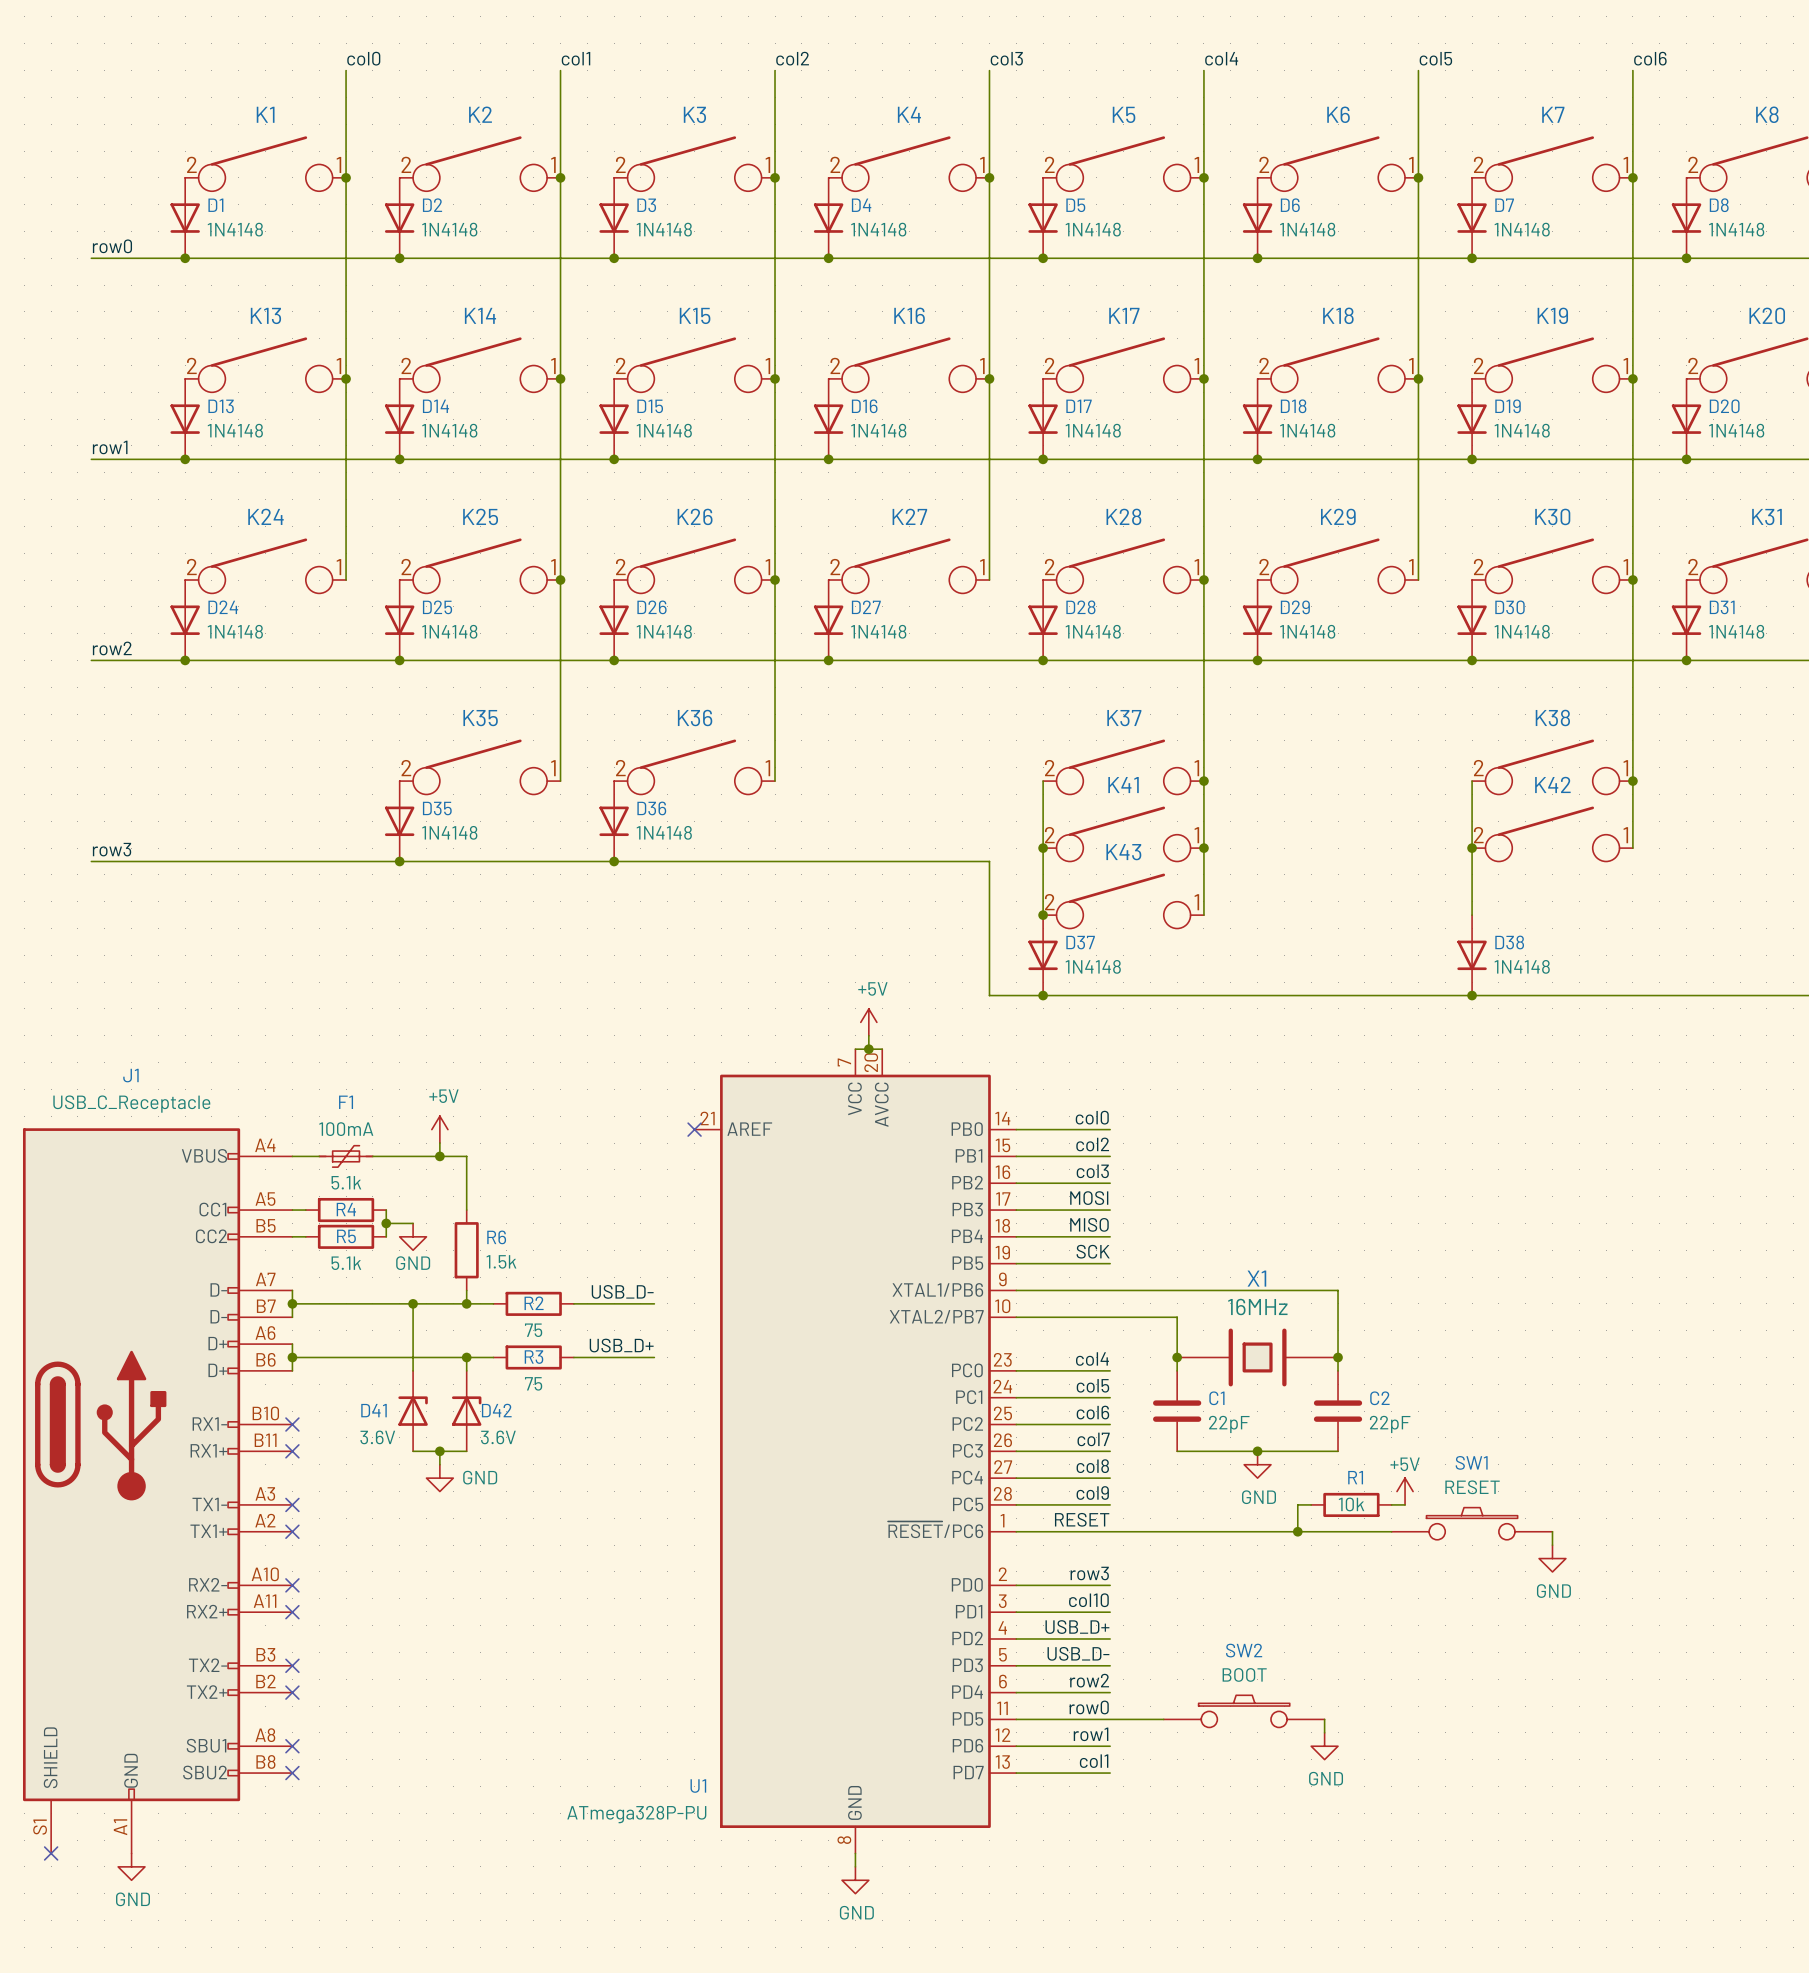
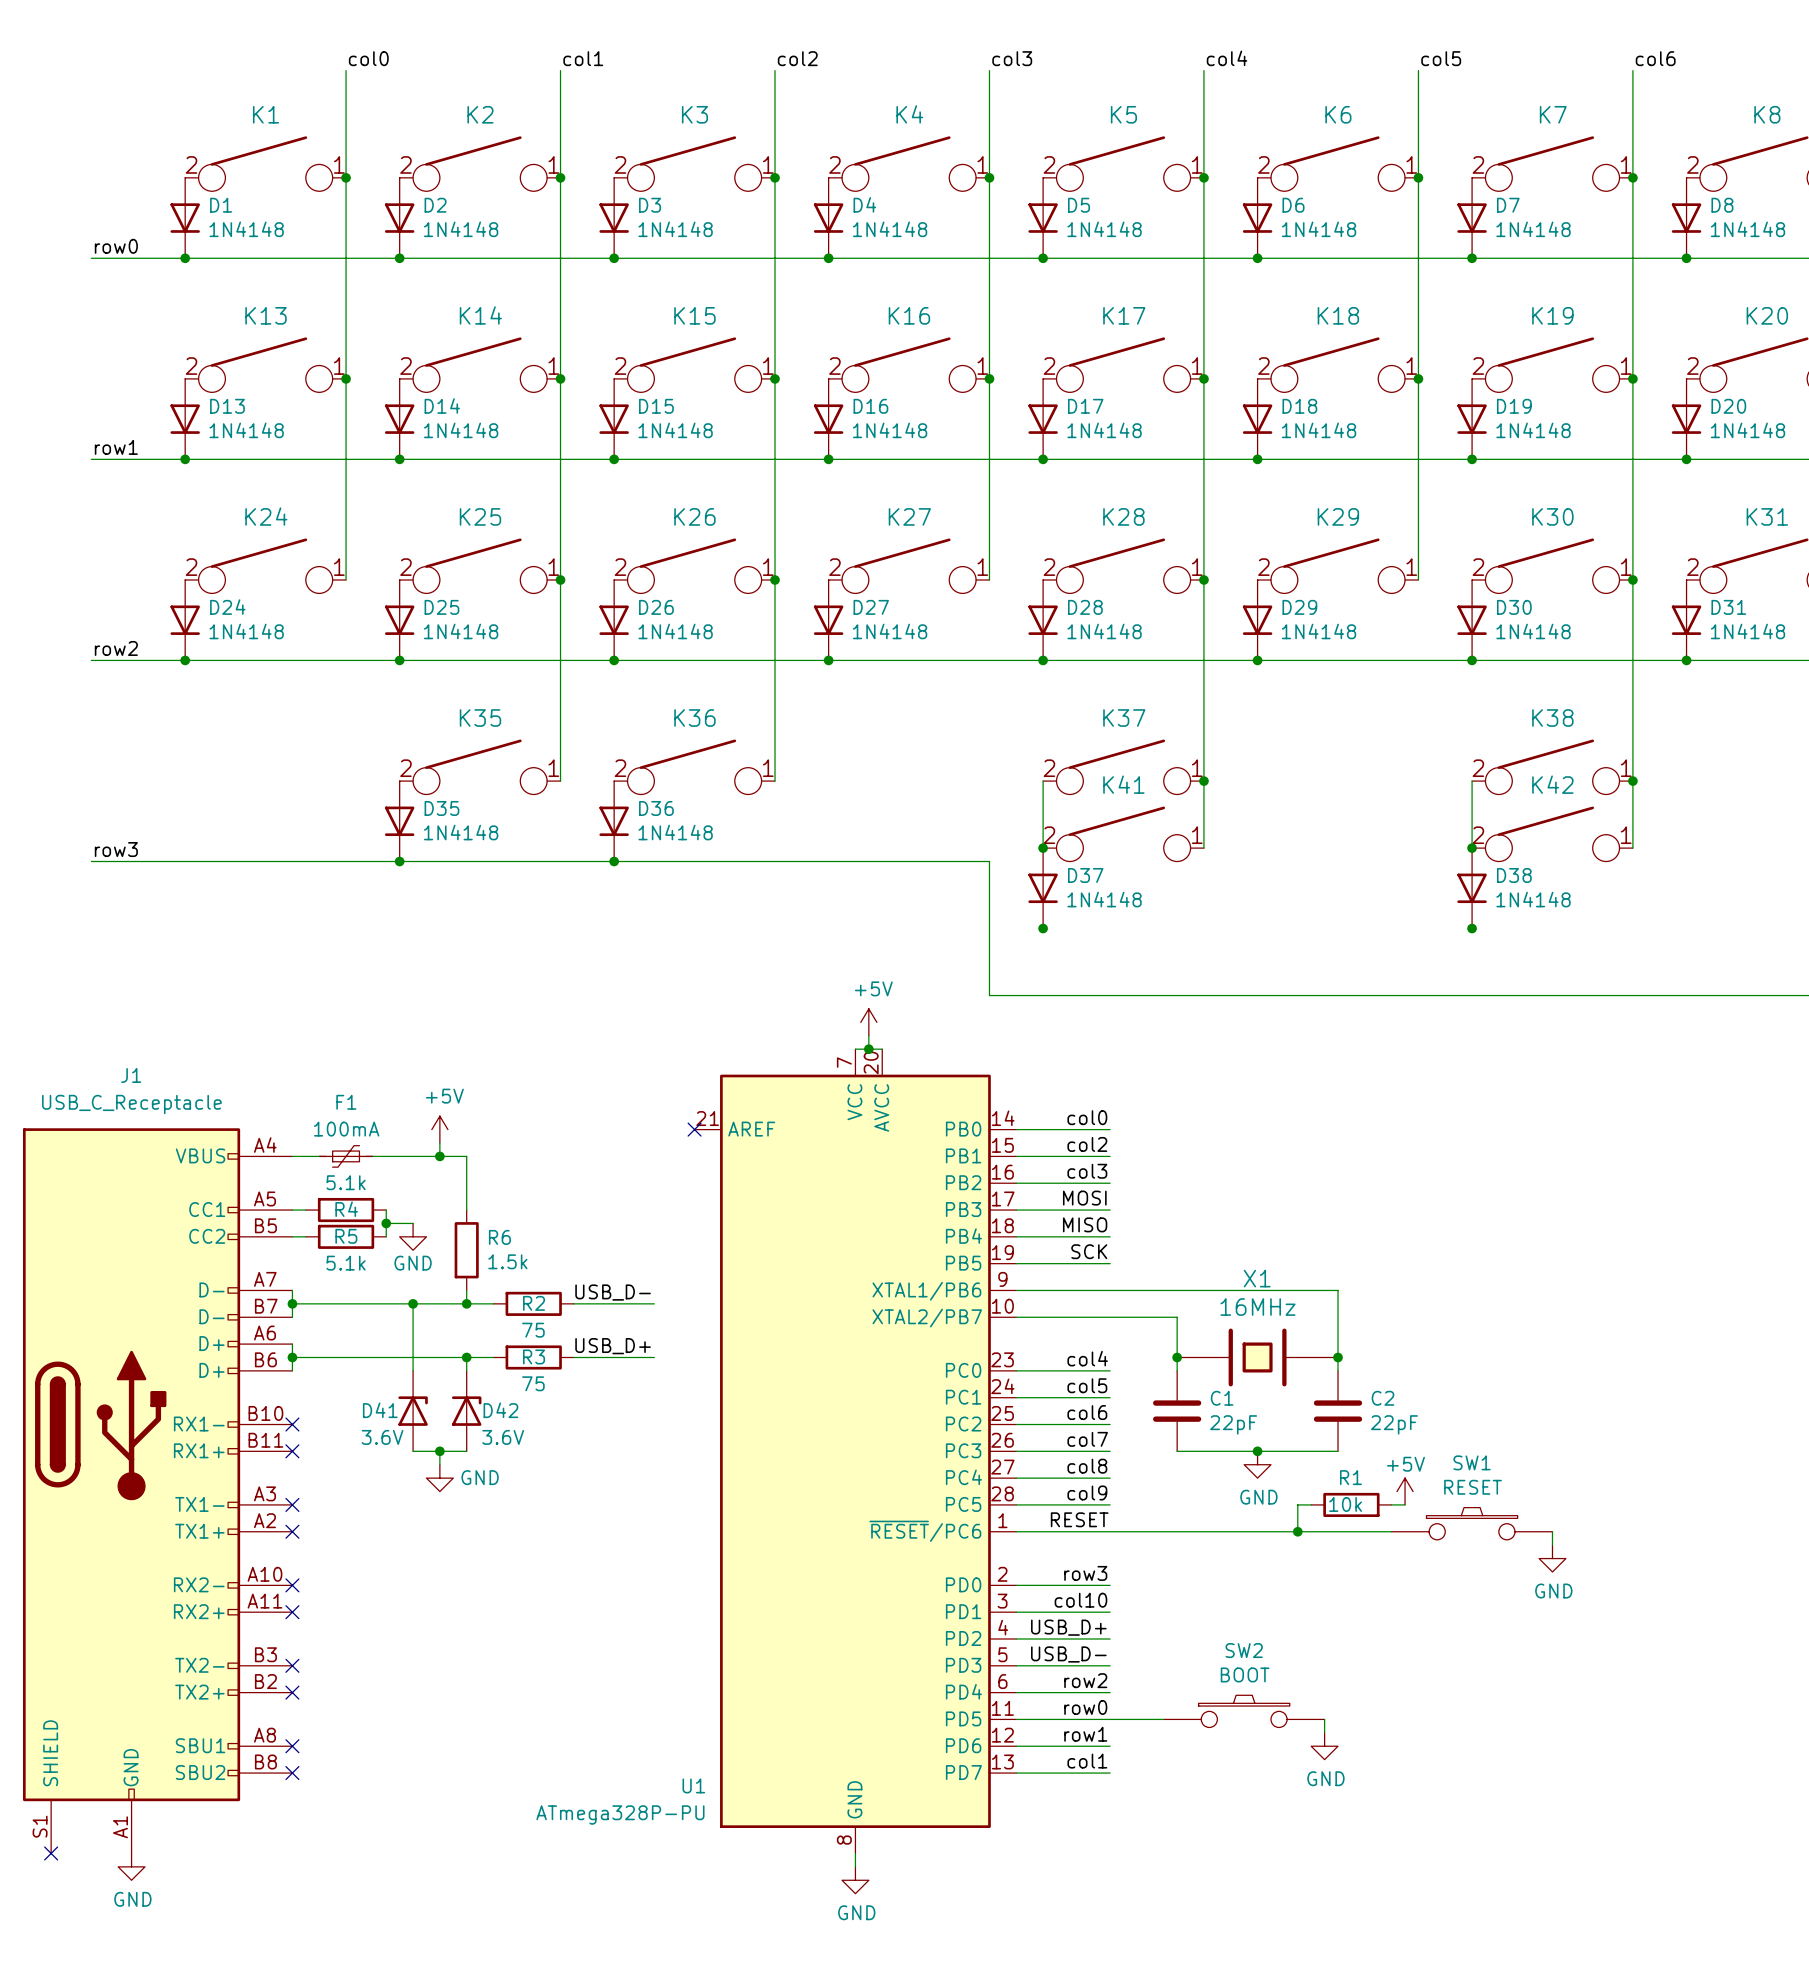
wire: (1203, 848) (1203, 915) -> none
junction: (1203, 848) -> none
K43: (1123, 901) -> none
junction position: (1043, 915) -> (1043, 928)
junction: none -> (1472, 928)
D37 position: (1043, 955) -> (1043, 888)
D38 position: (1472, 955) -> (1472, 888)
junction: (1043, 995) -> none
junction: (1472, 995) -> none

